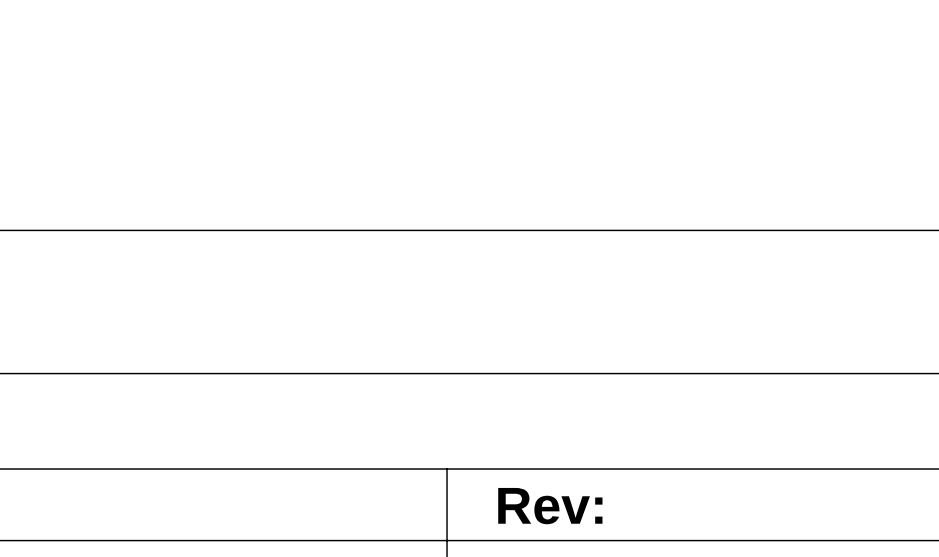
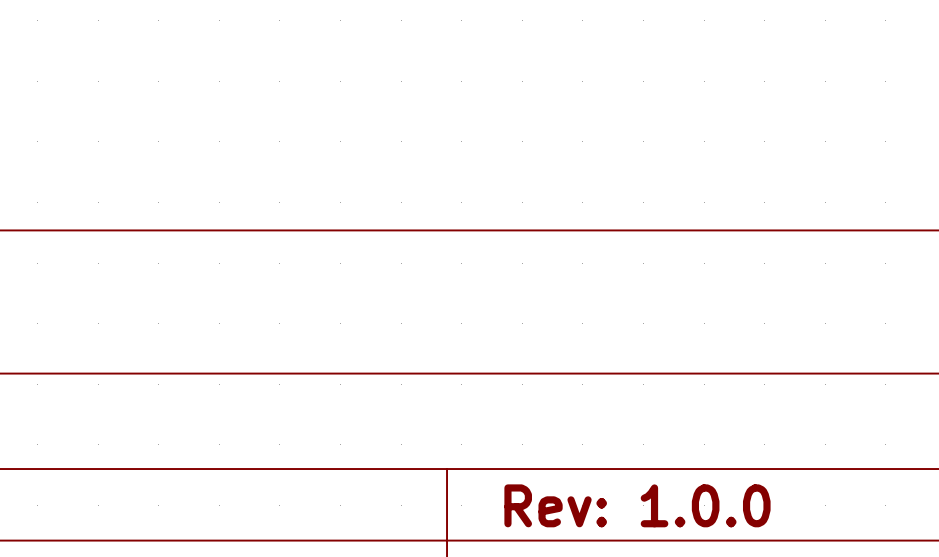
title block: Rev: (550, 506) -> Rev: 1.0.0 (637, 505)

